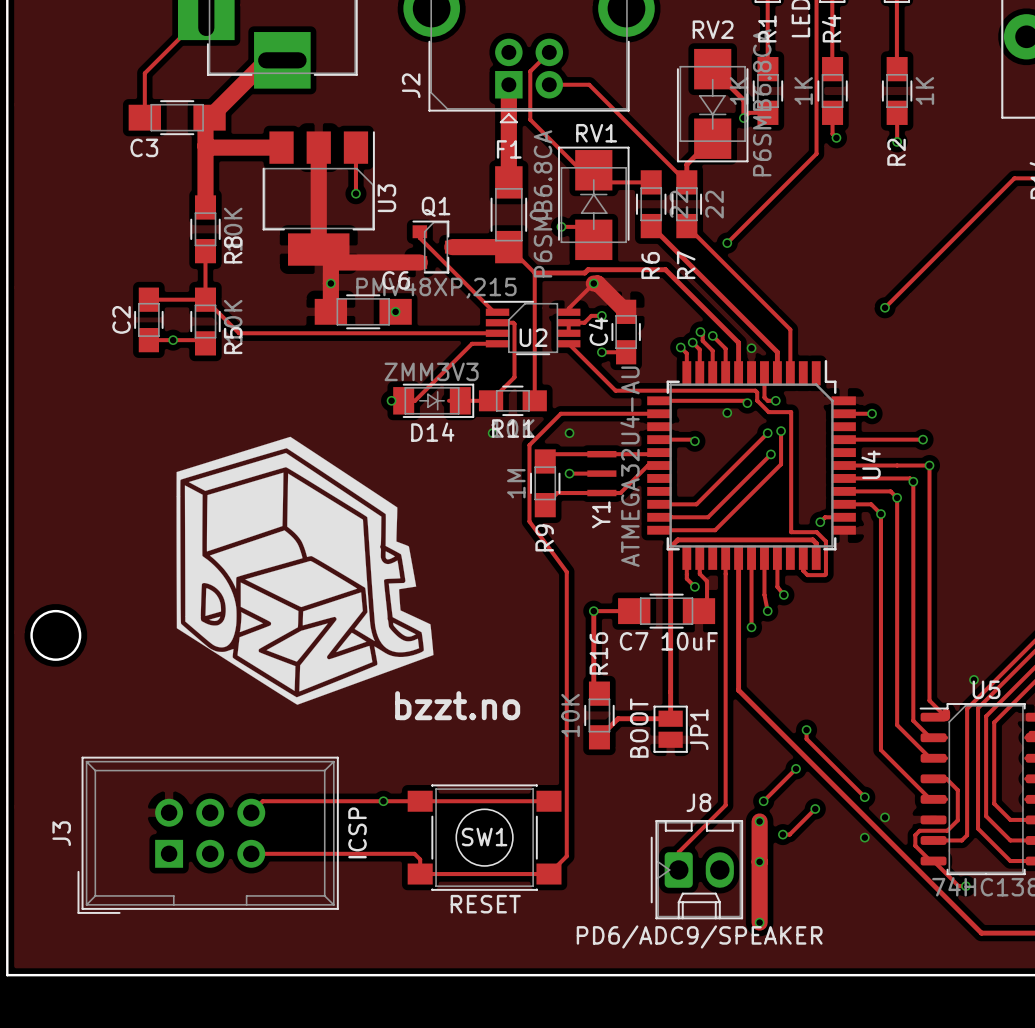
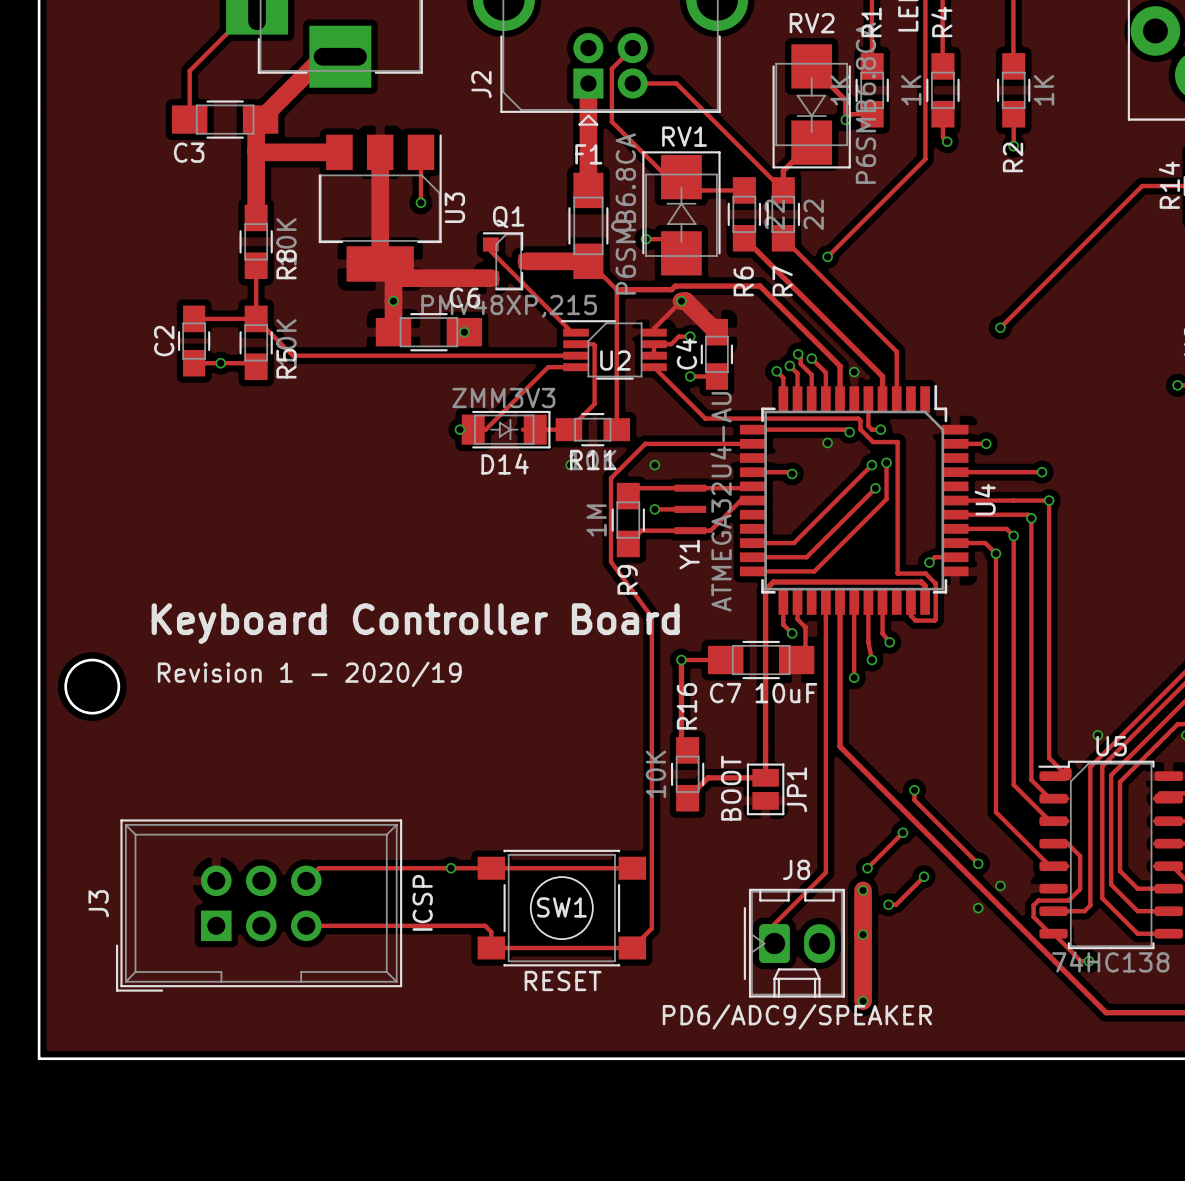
drawing: [176, 436, 434, 705] -> none
text: none -> Keyboard Controller Board (415, 623)
text: none -> Revision 1 - 2020/19 (309, 674)
text: bzzt.no (457, 705) -> none

